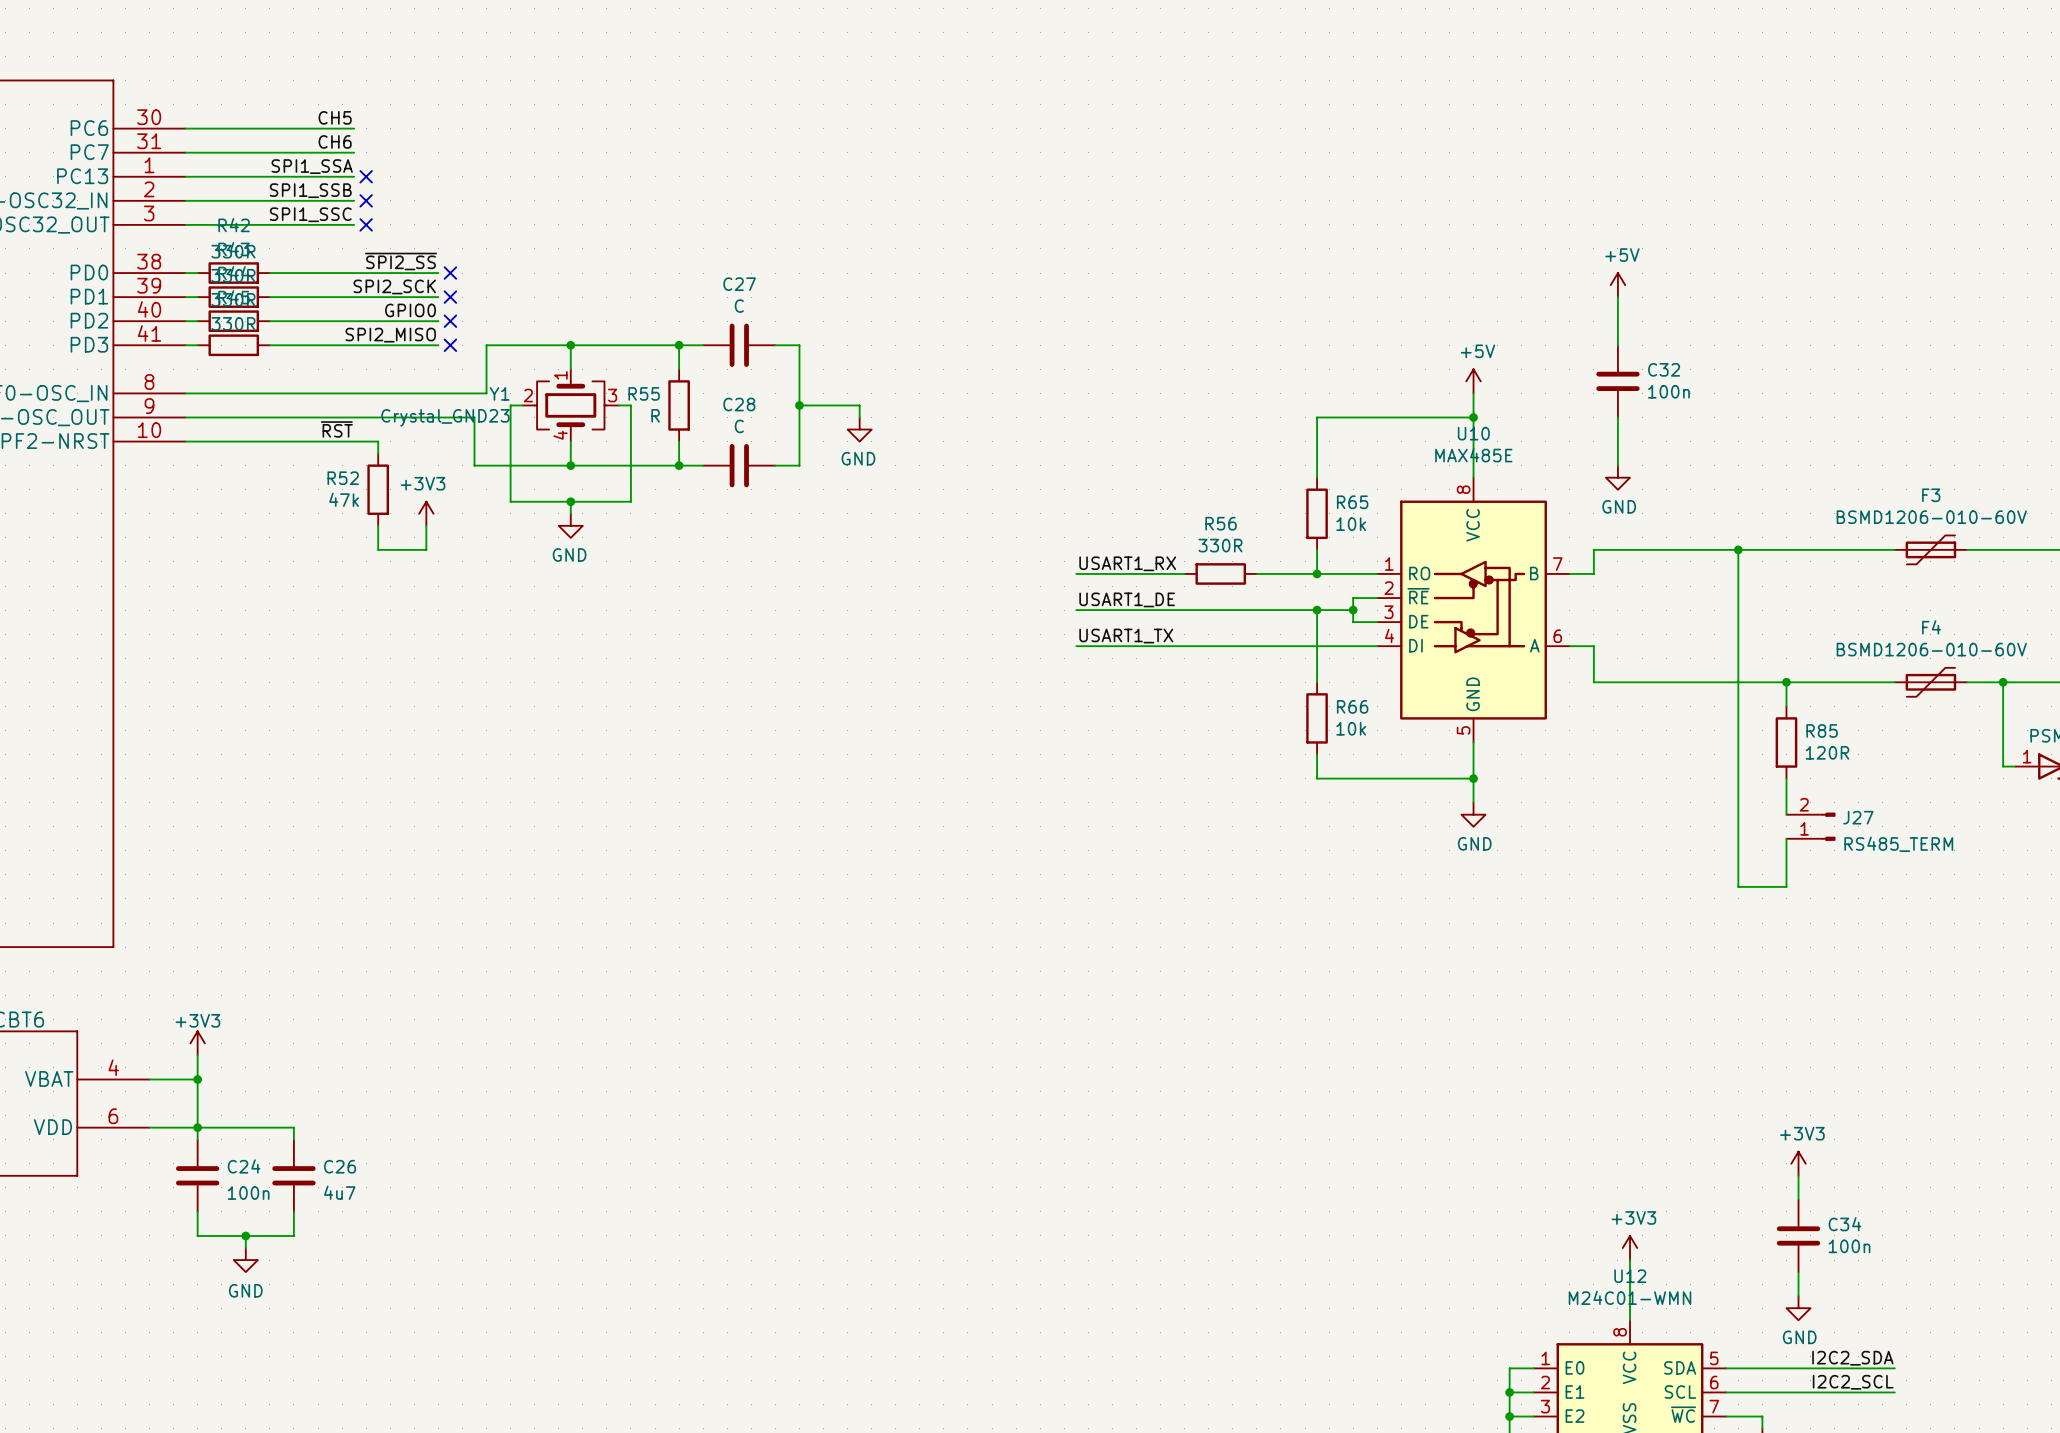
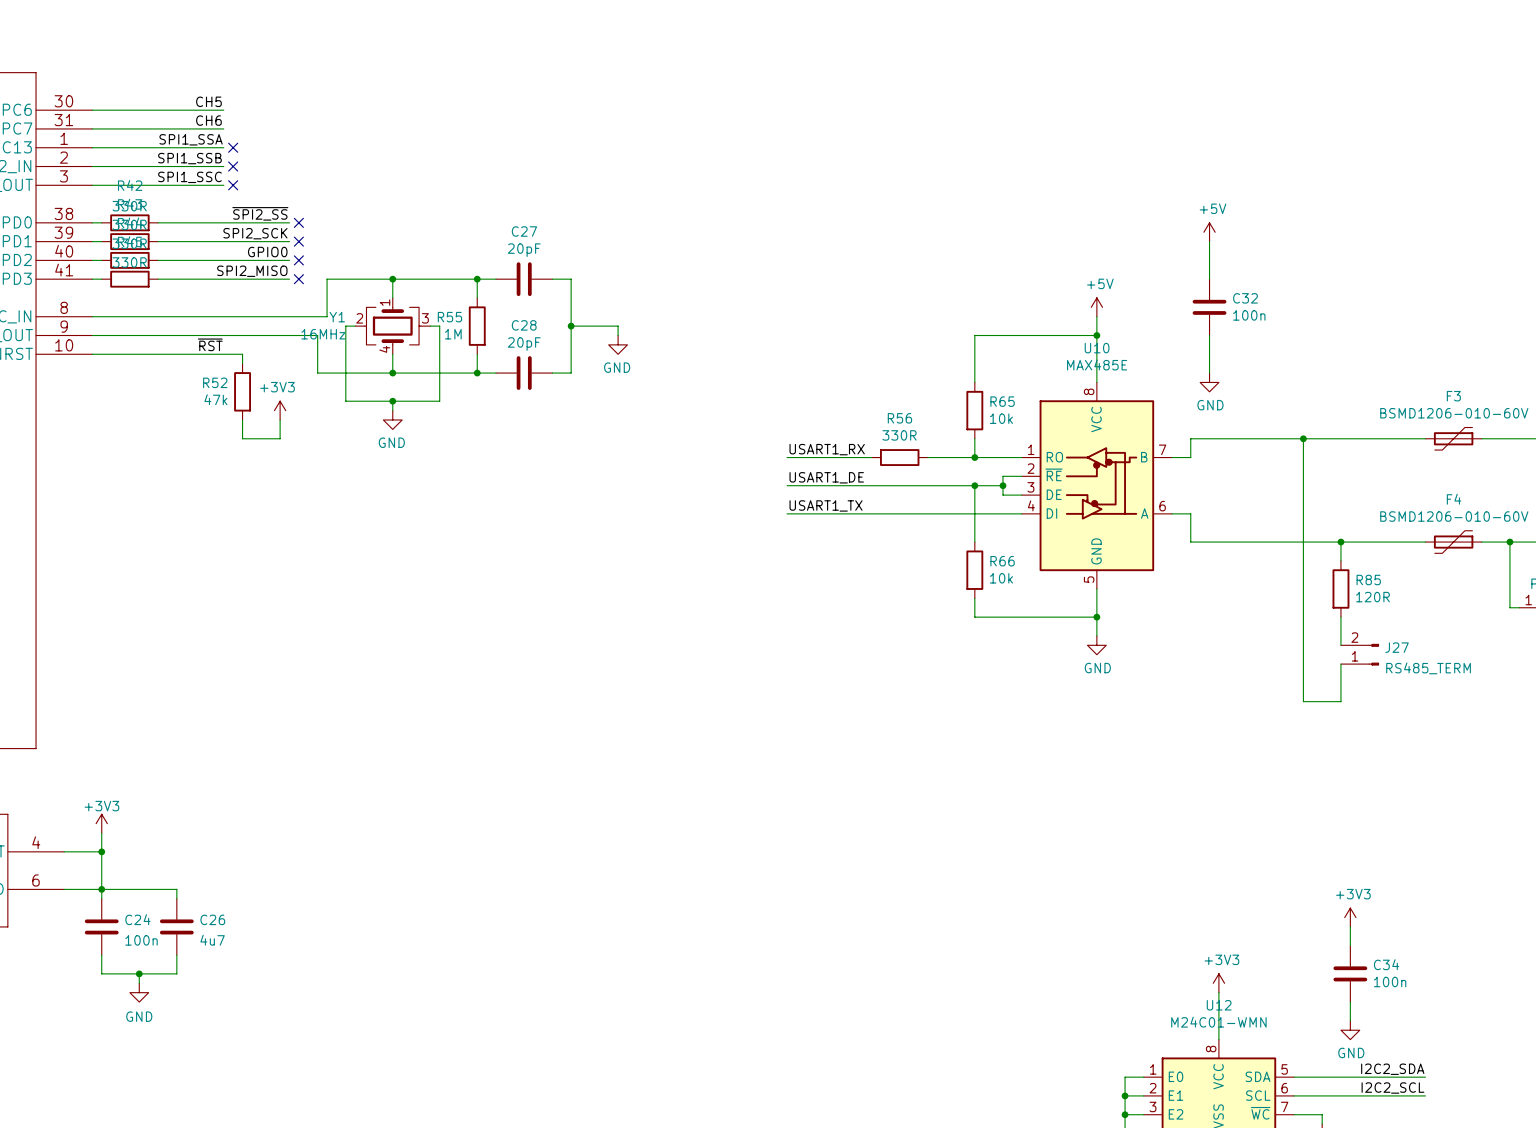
C27 value: C (739, 306) -> 20pF (524, 250)
R55 value: R (655, 415) -> 1M (453, 334)
Y1 value: Crystal_GND23 (445, 417) -> 16MHz (323, 334)
C28 value: C (739, 426) -> 20pF (524, 344)

